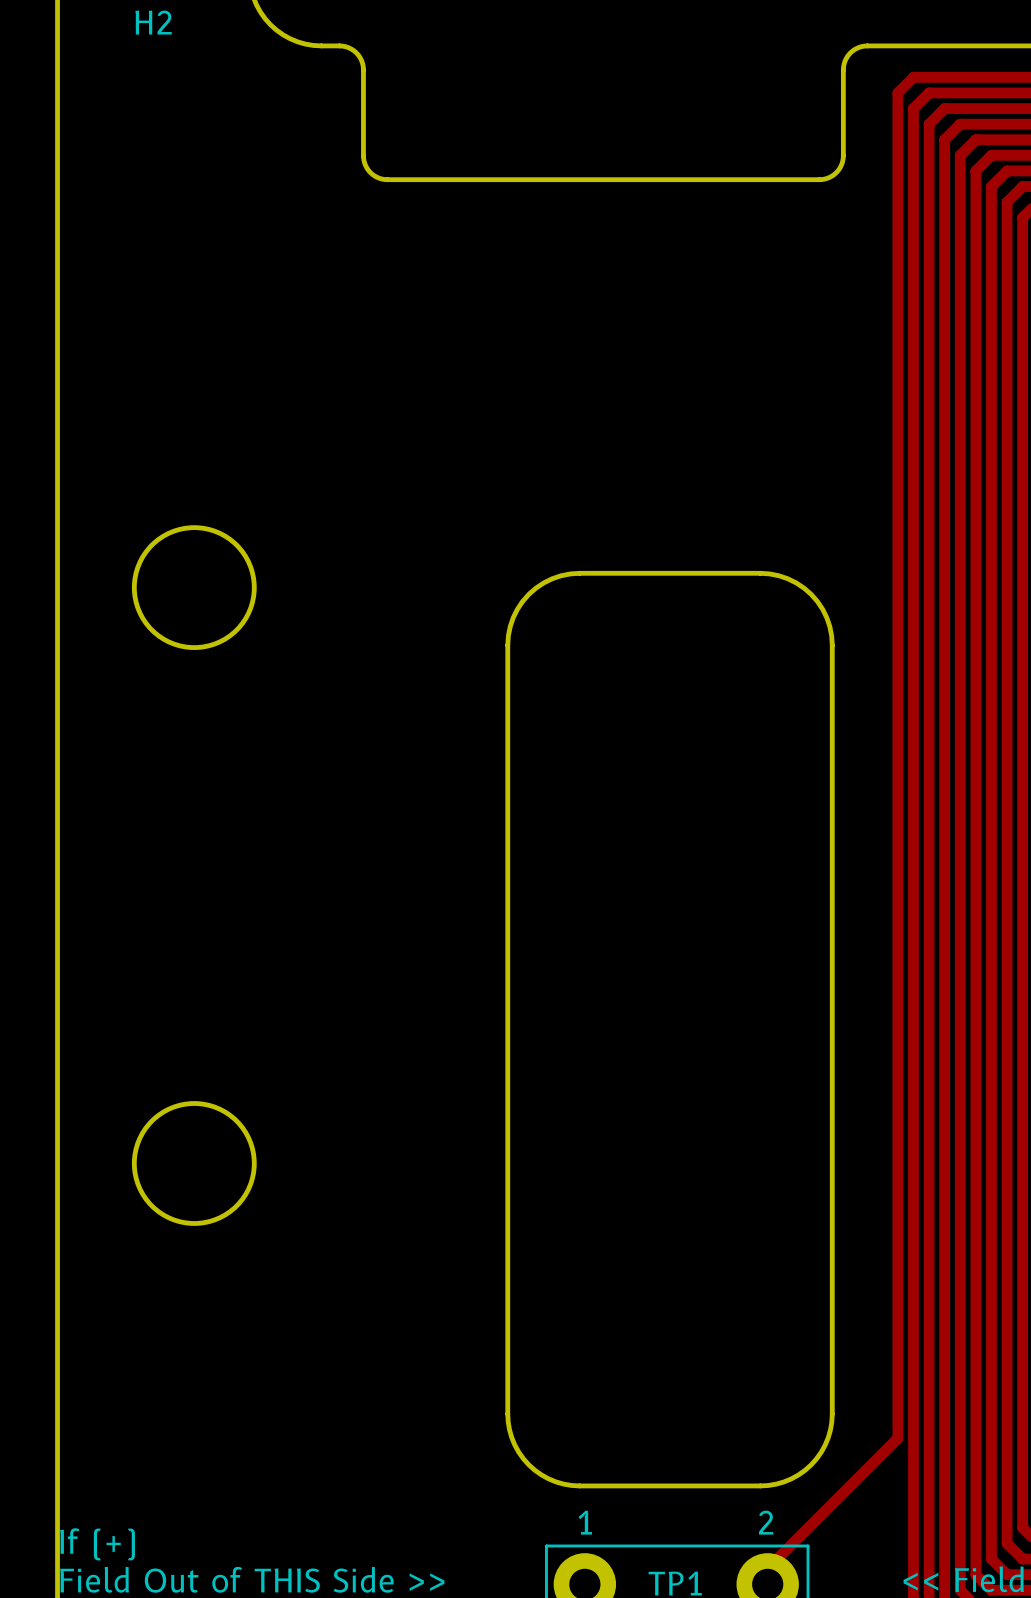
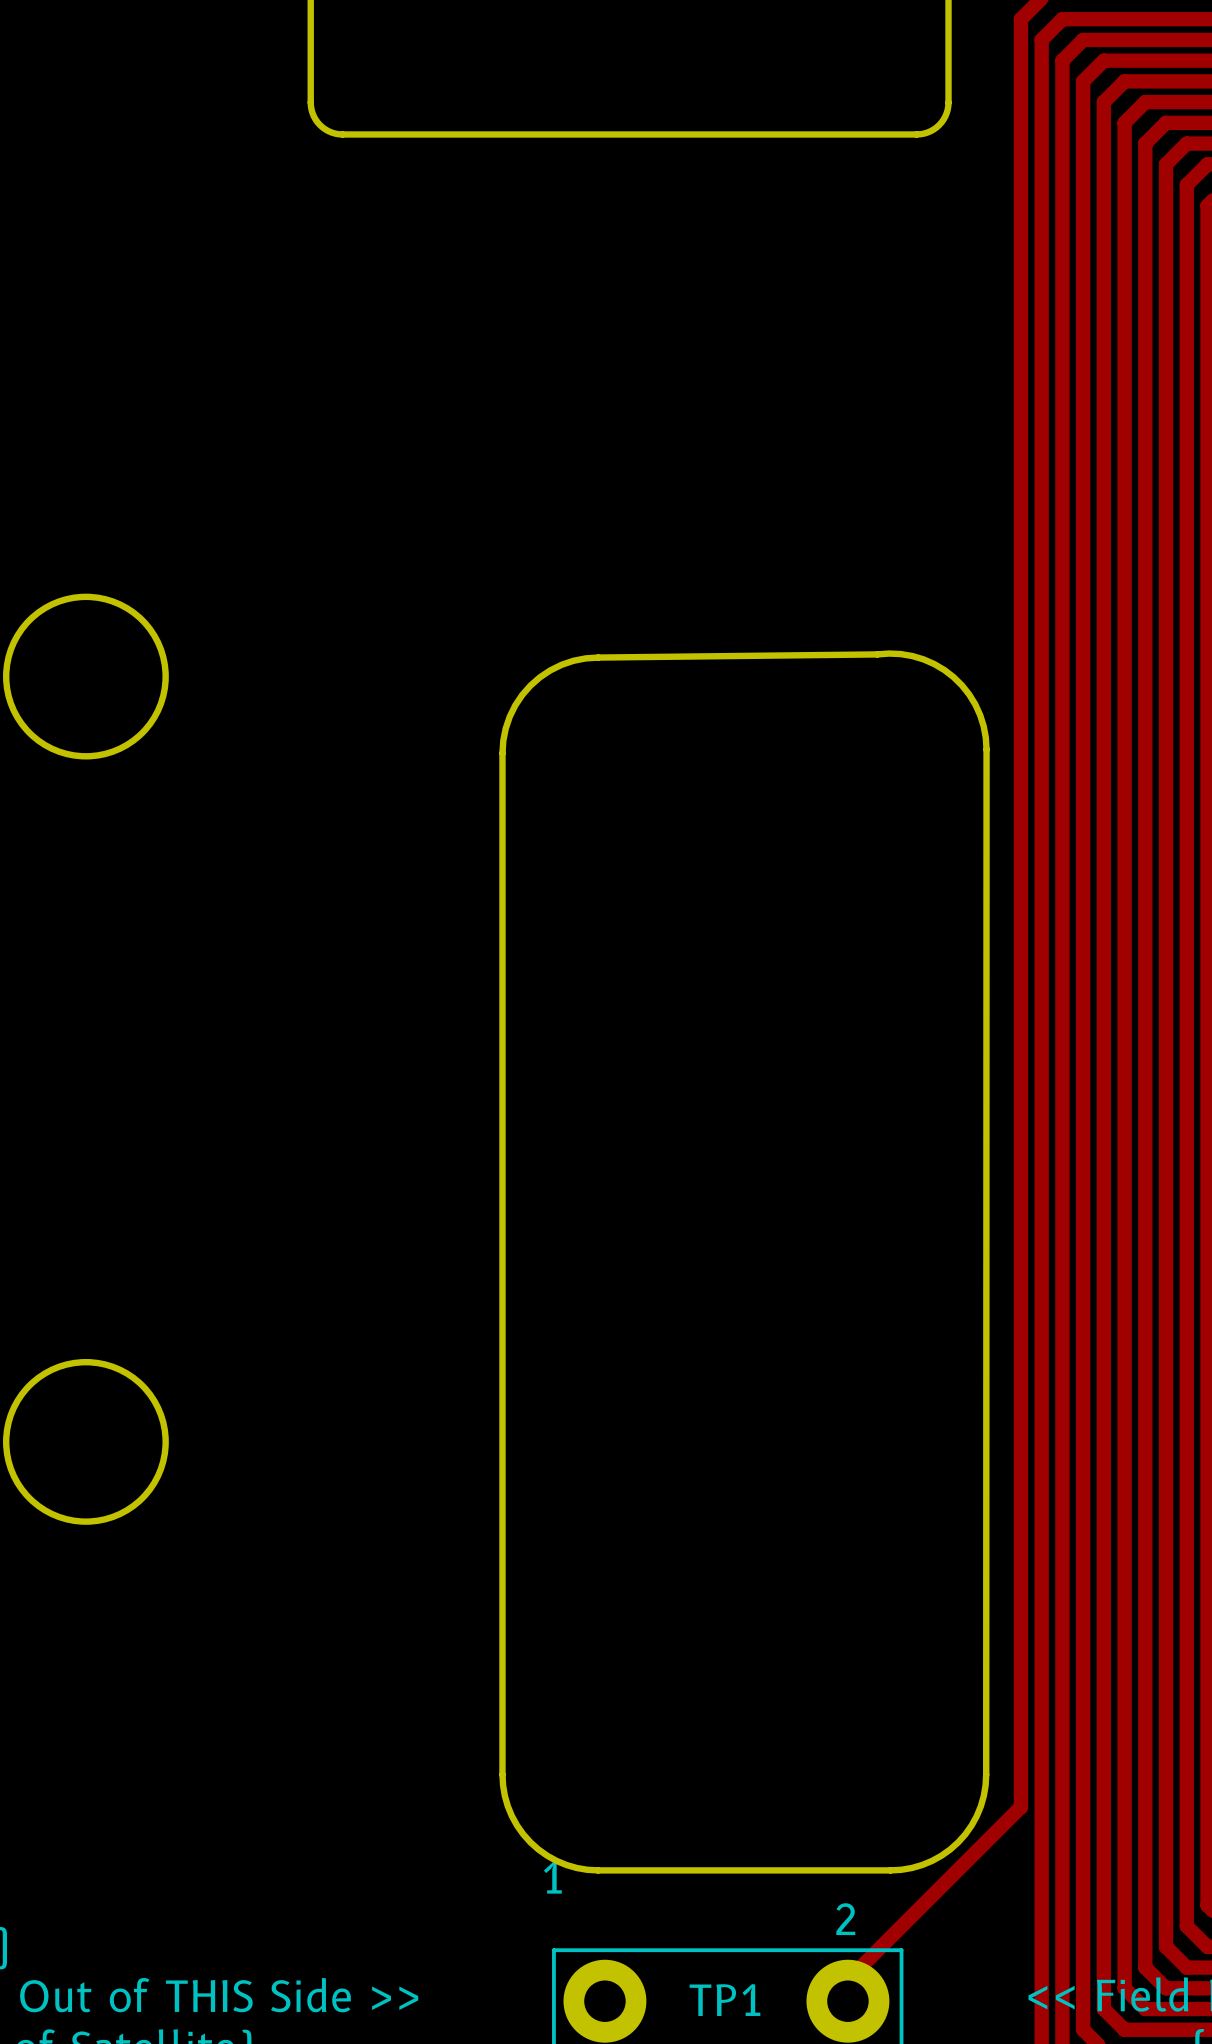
board edge: (579, 573) (760, 573) (778, 575) (796, 582) (811, 594) (822, 609) (831, 635) (831, 1422) (825, 1445) (816, 1458) (805, 1470) (784, 1481) (760, 1485) -> (598, 657) (889, 653) (912, 656) (934, 664) (953, 677) (969, 694) (983, 726) (986, 749) (985, 1785) (980, 1806) (971, 1825) (958, 1842) (941, 1855) (922, 1865) (901, 1869) (838, 1870)
text position: 1 (585, 1522) -> 1 (552, 1877)

